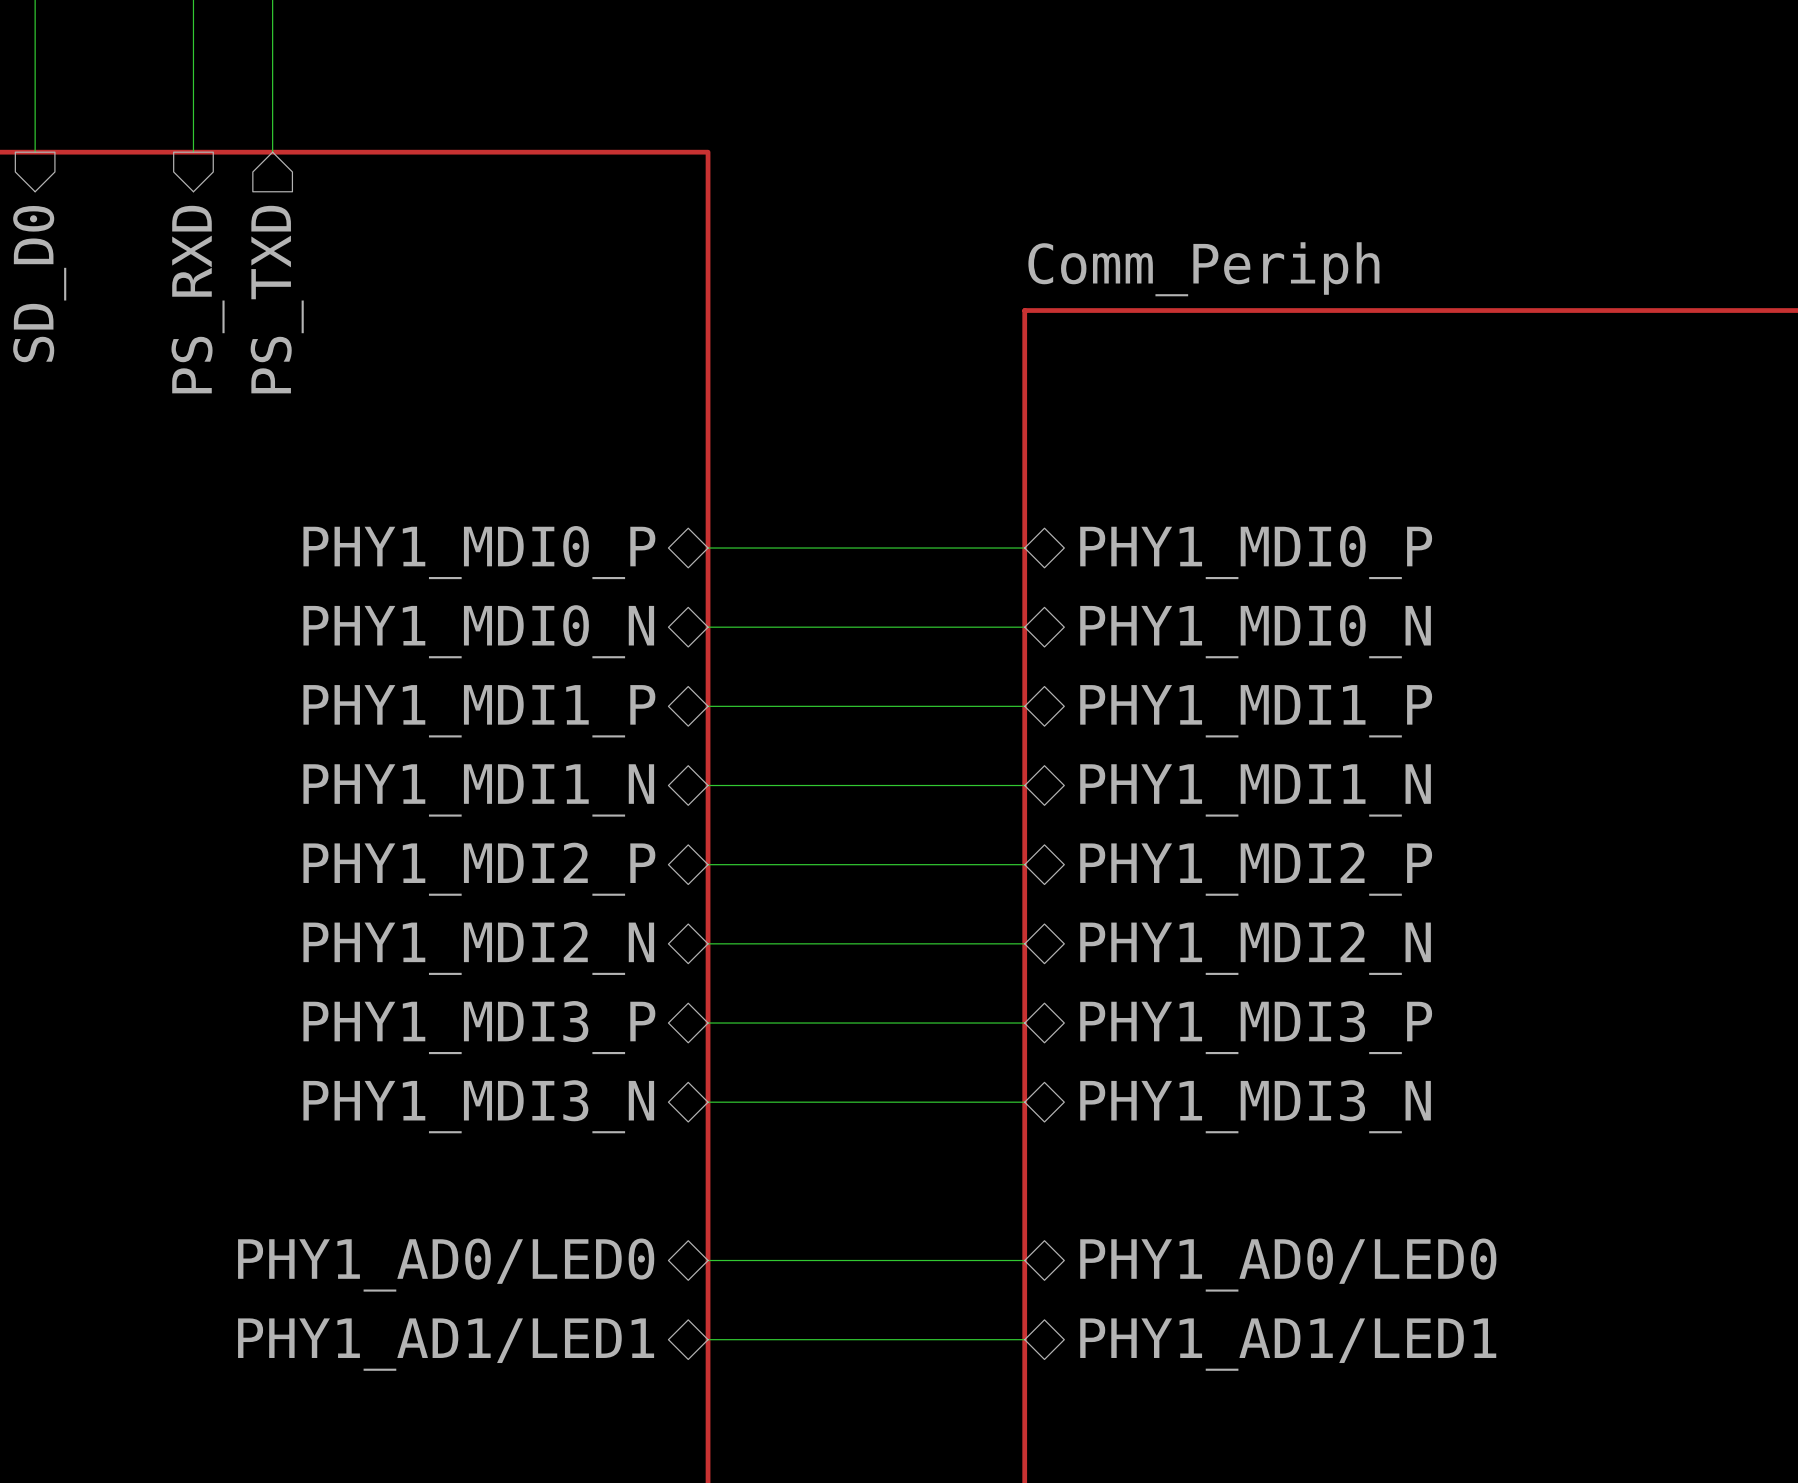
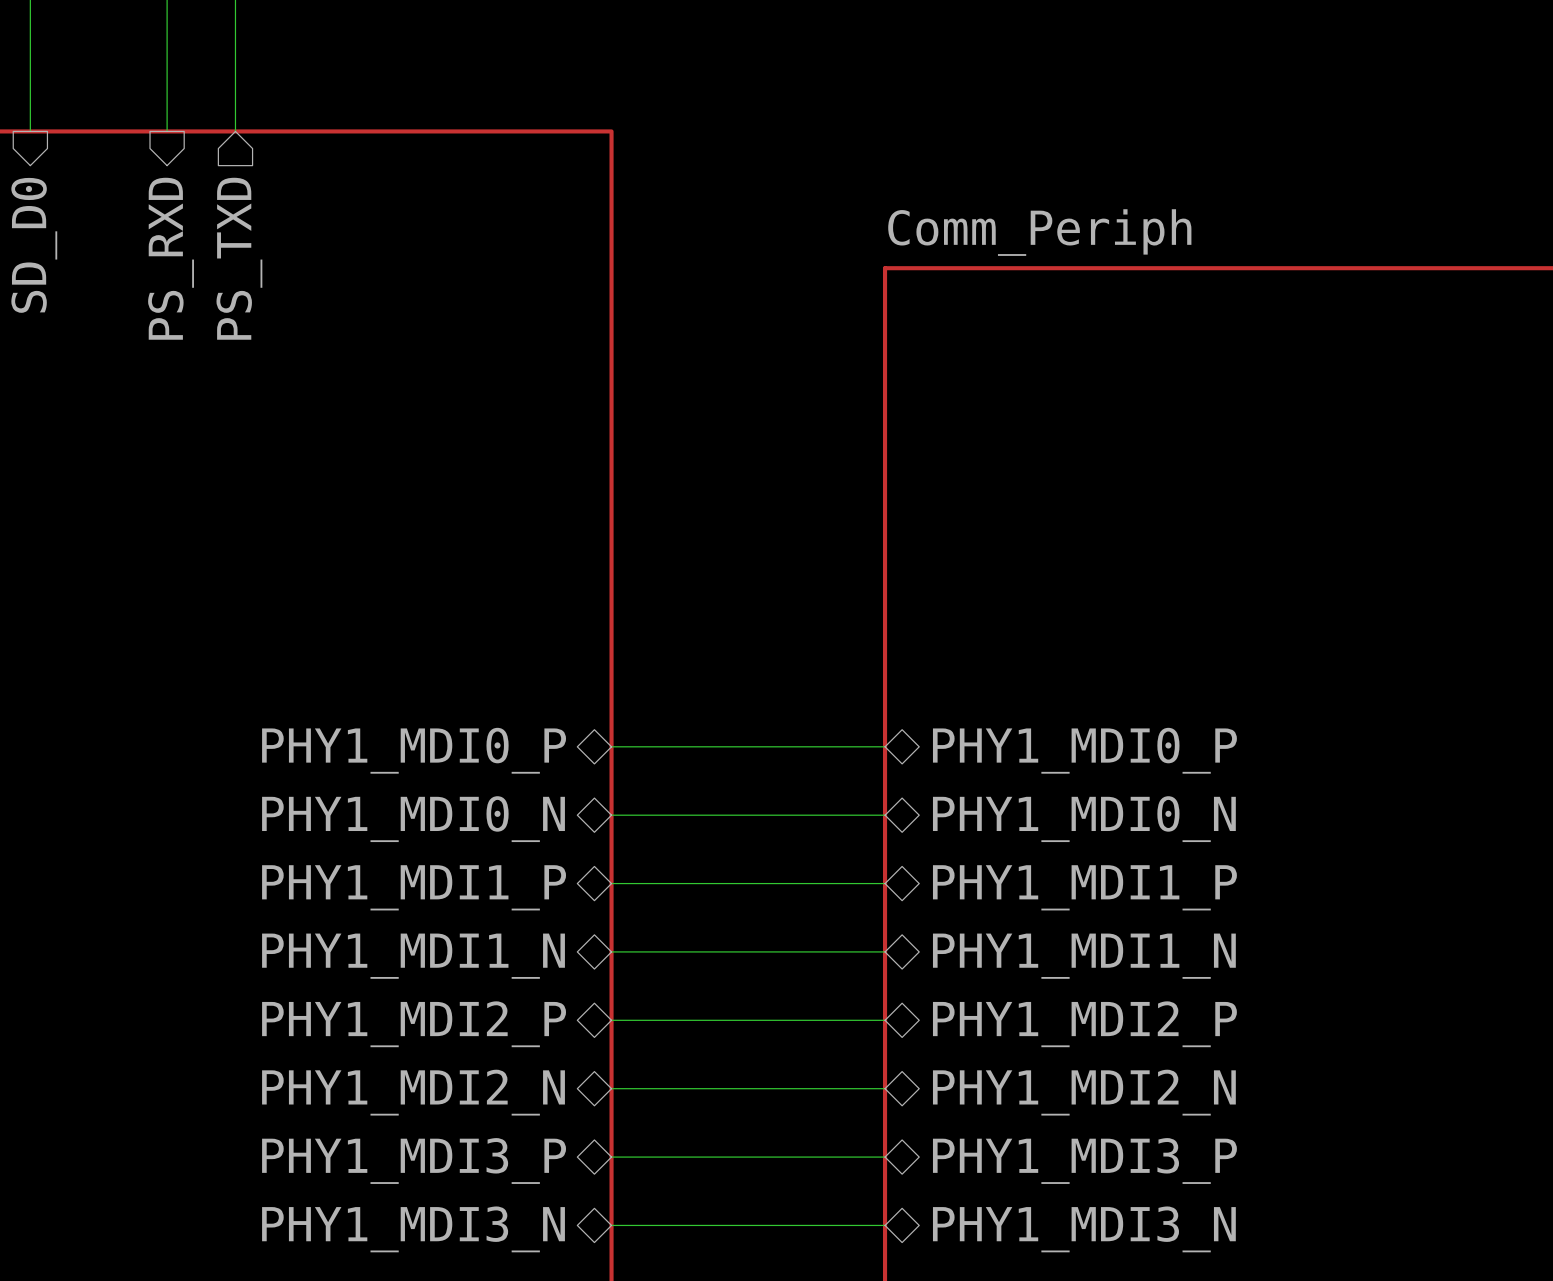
wire: (708, 548) (1024, 548) -> (611, 1020) (885, 1020)
sheet pin: PHY1_MDI0_P (479, 552) -> none
sheet pin: PHY1_MDI0_P (1256, 552) -> none
wire: (708, 627) (1024, 627) -> none
sheet pin: PHY1_MDI0_N (478, 631) -> none
sheet pin: PHY1_MDI0_N (1255, 631) -> none
wire: (708, 706) (1024, 706) -> none
sheet pin: PHY1_MDI1_P (479, 711) -> none
sheet pin: PHY1_MDI1_P (1256, 711) -> none
wire: (708, 785) (1024, 785) -> (611, 1225) (885, 1225)
sheet pin: PHY1_MDI1_N (478, 790) -> none
sheet pin: PHY1_MDI1_N (1255, 790) -> none
sheet pin: PHY1_MDI2_P (479, 869) -> PHY1_MDI0_P (414, 750)
sheet pin: PHY1_MDI2_P (1256, 869) -> PHY1_MDI0_P (1084, 750)
sheet pin: PHY1_MDI2_N (478, 948) -> PHY1_MDI0_N (413, 819)
sheet pin: PHY1_MDI2_N (1255, 948) -> PHY1_MDI0_N (1084, 819)
sheet pin: PHY1_MDI3_P (479, 1027) -> PHY1_MDI1_P (414, 887)
sheet pin: PHY1_MDI3_P (1256, 1027) -> PHY1_MDI1_P (1084, 887)
sheet pin: PHY1_MDI3_N (478, 1106) -> PHY1_MDI1_N (413, 956)
sheet pin: PHY1_MDI3_N (1255, 1106) -> PHY1_MDI1_N (1084, 956)
sheet pin: none -> PHY1_MDI2_P (414, 1024)
sheet pin: none -> PHY1_MDI2_P (1084, 1024)
sheet pin: PHY1_AD0/LED0 (446, 1265) -> PHY1_MDI2_N (413, 1092)
sheet pin: PHY1_AD0/LED0 (1288, 1265) -> PHY1_MDI2_N (1084, 1092)
sheet pin: PHY1_AD1/LED1 (446, 1344) -> PHY1_MDI3_P (414, 1161)
sheet pin: PHY1_AD1/LED1 (1288, 1344) -> PHY1_MDI3_P (1084, 1161)
sheet pin: none -> PHY1_MDI3_N (413, 1229)
sheet pin: none -> PHY1_MDI3_N (1084, 1229)

